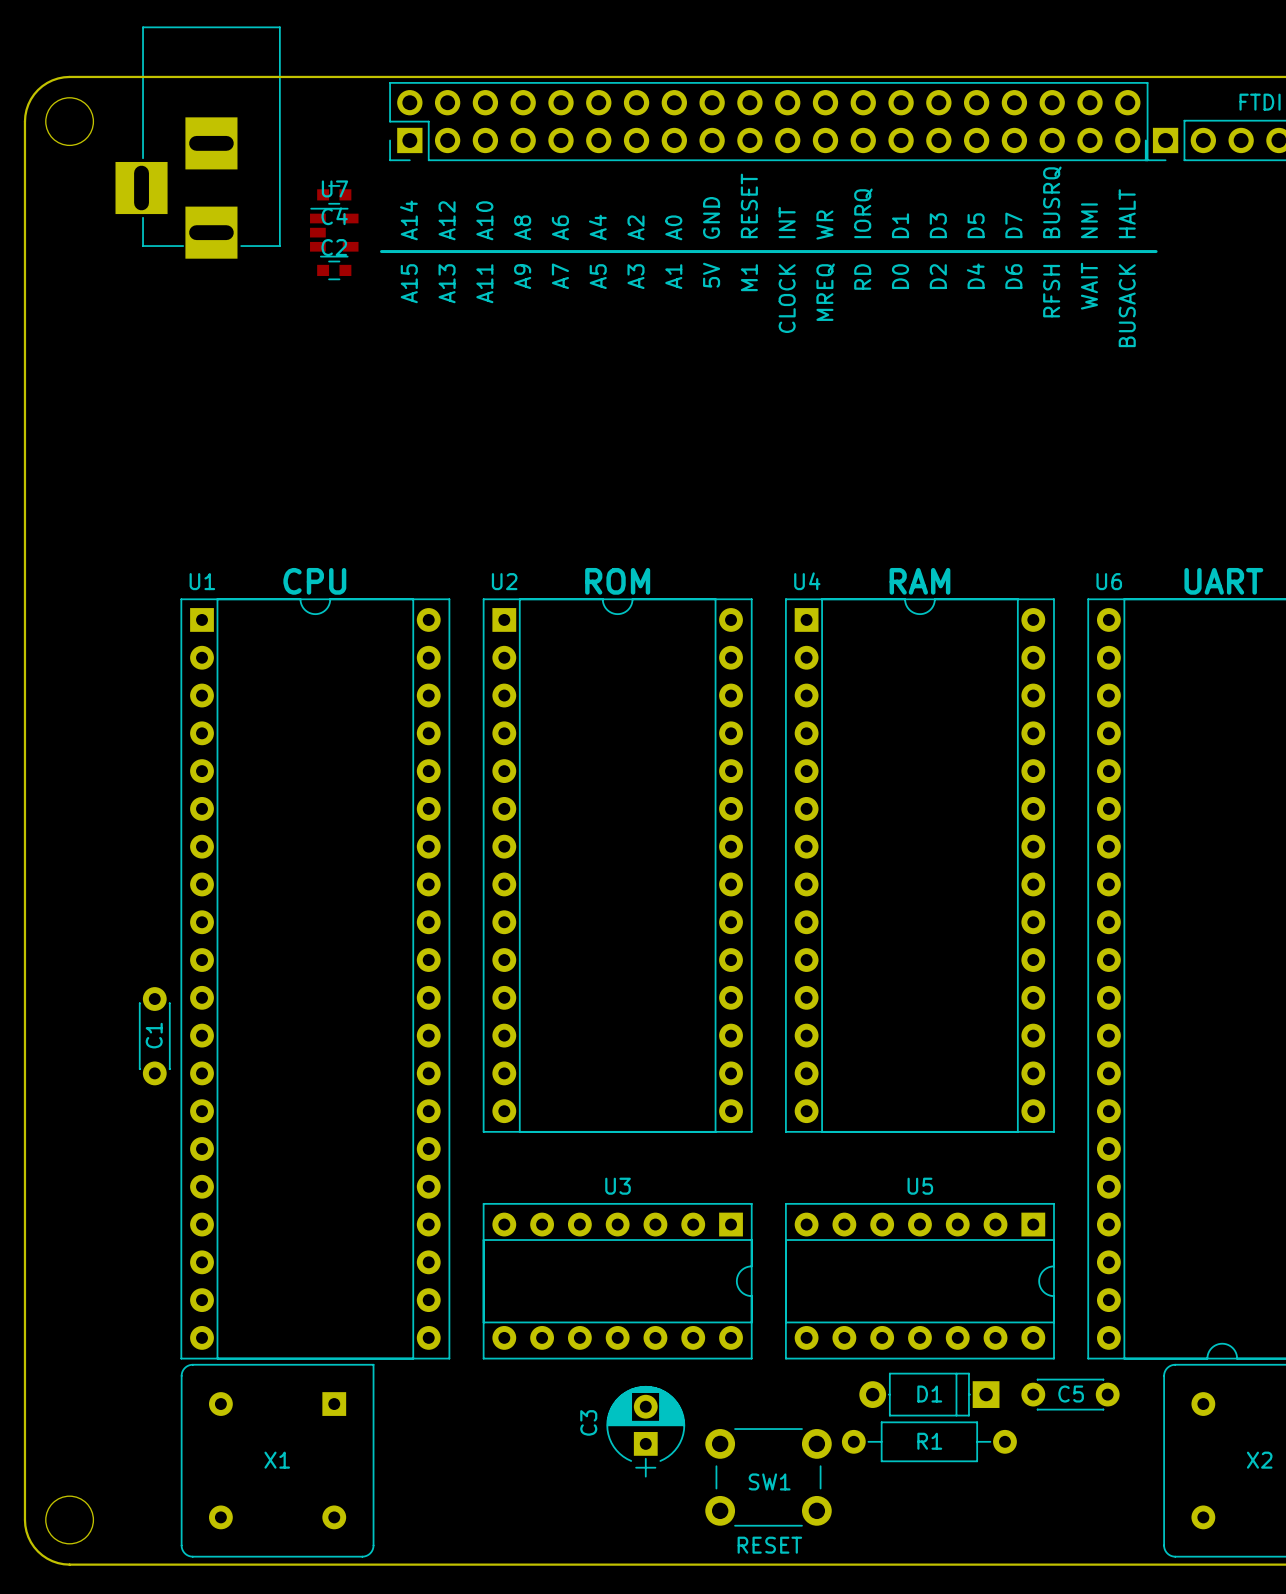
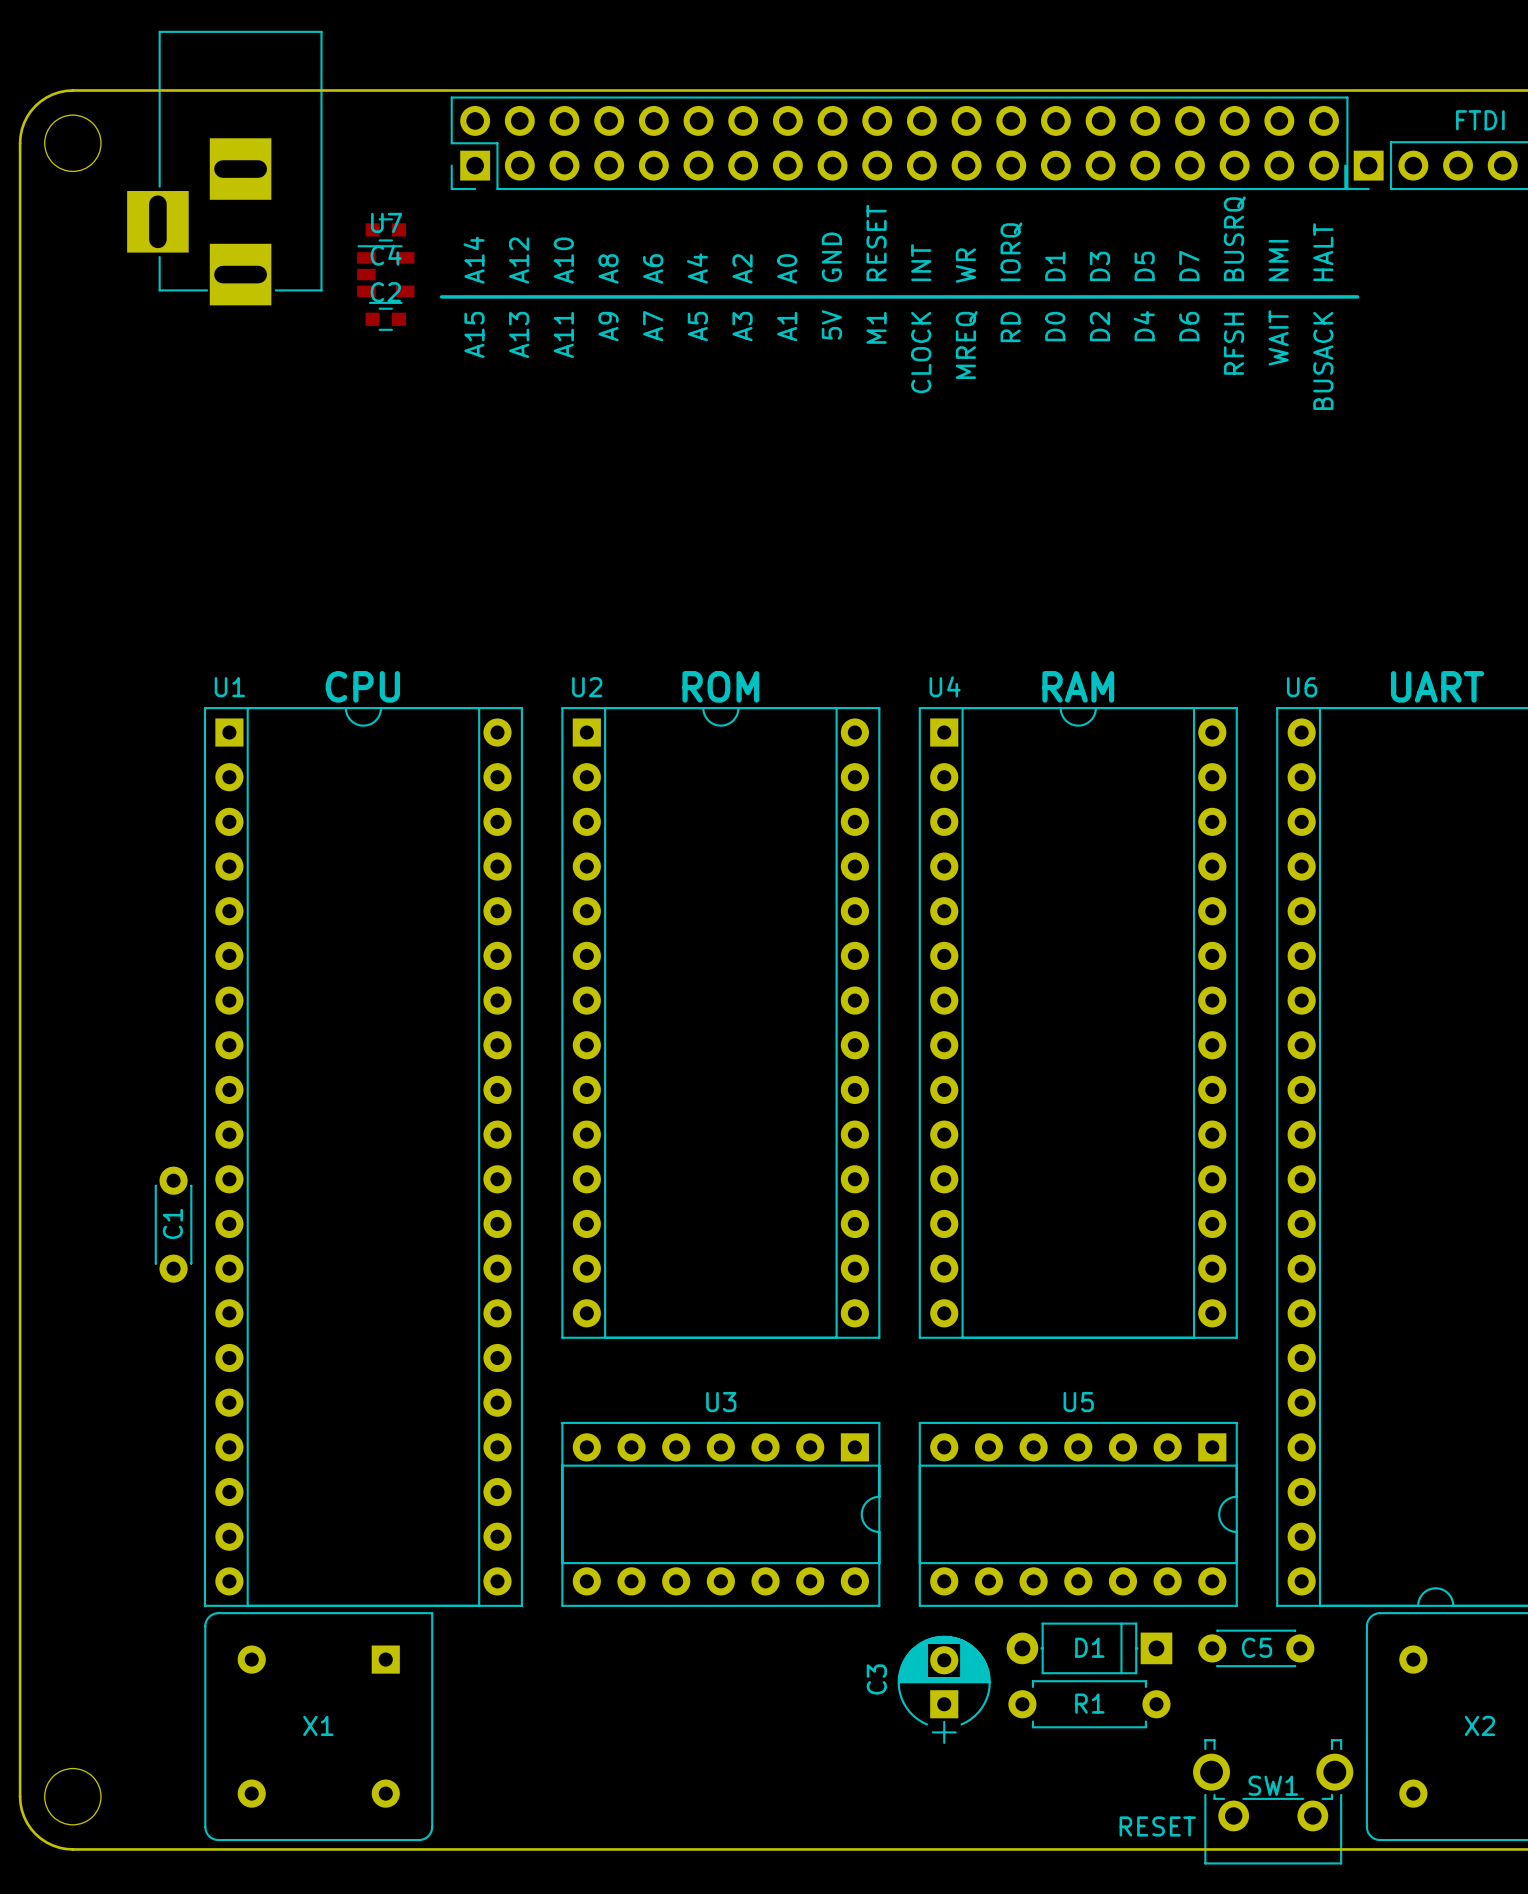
R1 footprint: [841, 1421, 1017, 1463] -> [1008, 1680, 1171, 1729]
SW1 footprint: [705, 1428, 832, 1527] -> [1193, 1739, 1354, 1865]
C3 position: (645, 1431) -> (944, 1689)
text position: RESET (769, 1545) -> RESET (1157, 1826)

